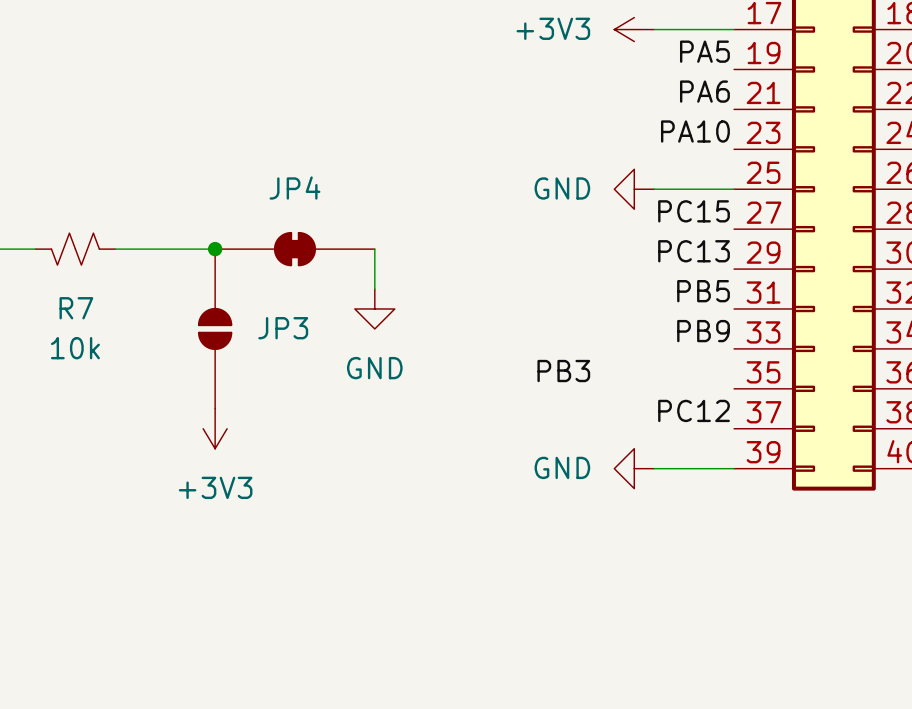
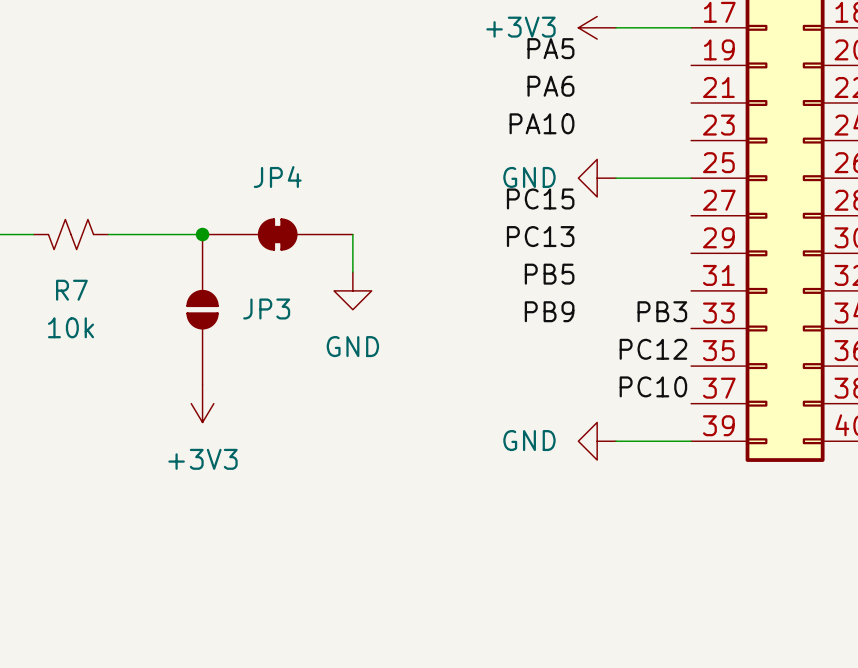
label position: PA5 (704, 51) -> PA5 (550, 48)
label position: PA6 (704, 91) -> PA6 (550, 86)
label position: PA10 (695, 131) -> PA10 (542, 123)
label position: PC15 (694, 211) -> PC15 (540, 198)
label position: PC13 (694, 251) -> PC13 (540, 236)
label position: PB5 (703, 291) -> PB5 (549, 274)
label: PB9 (703, 331) -> PB3 (662, 311)
label: PB3 (563, 371) -> PB9 (549, 311)
label: none -> PC12 (653, 349)
label: PC12 (694, 410) -> PC10 (653, 386)

